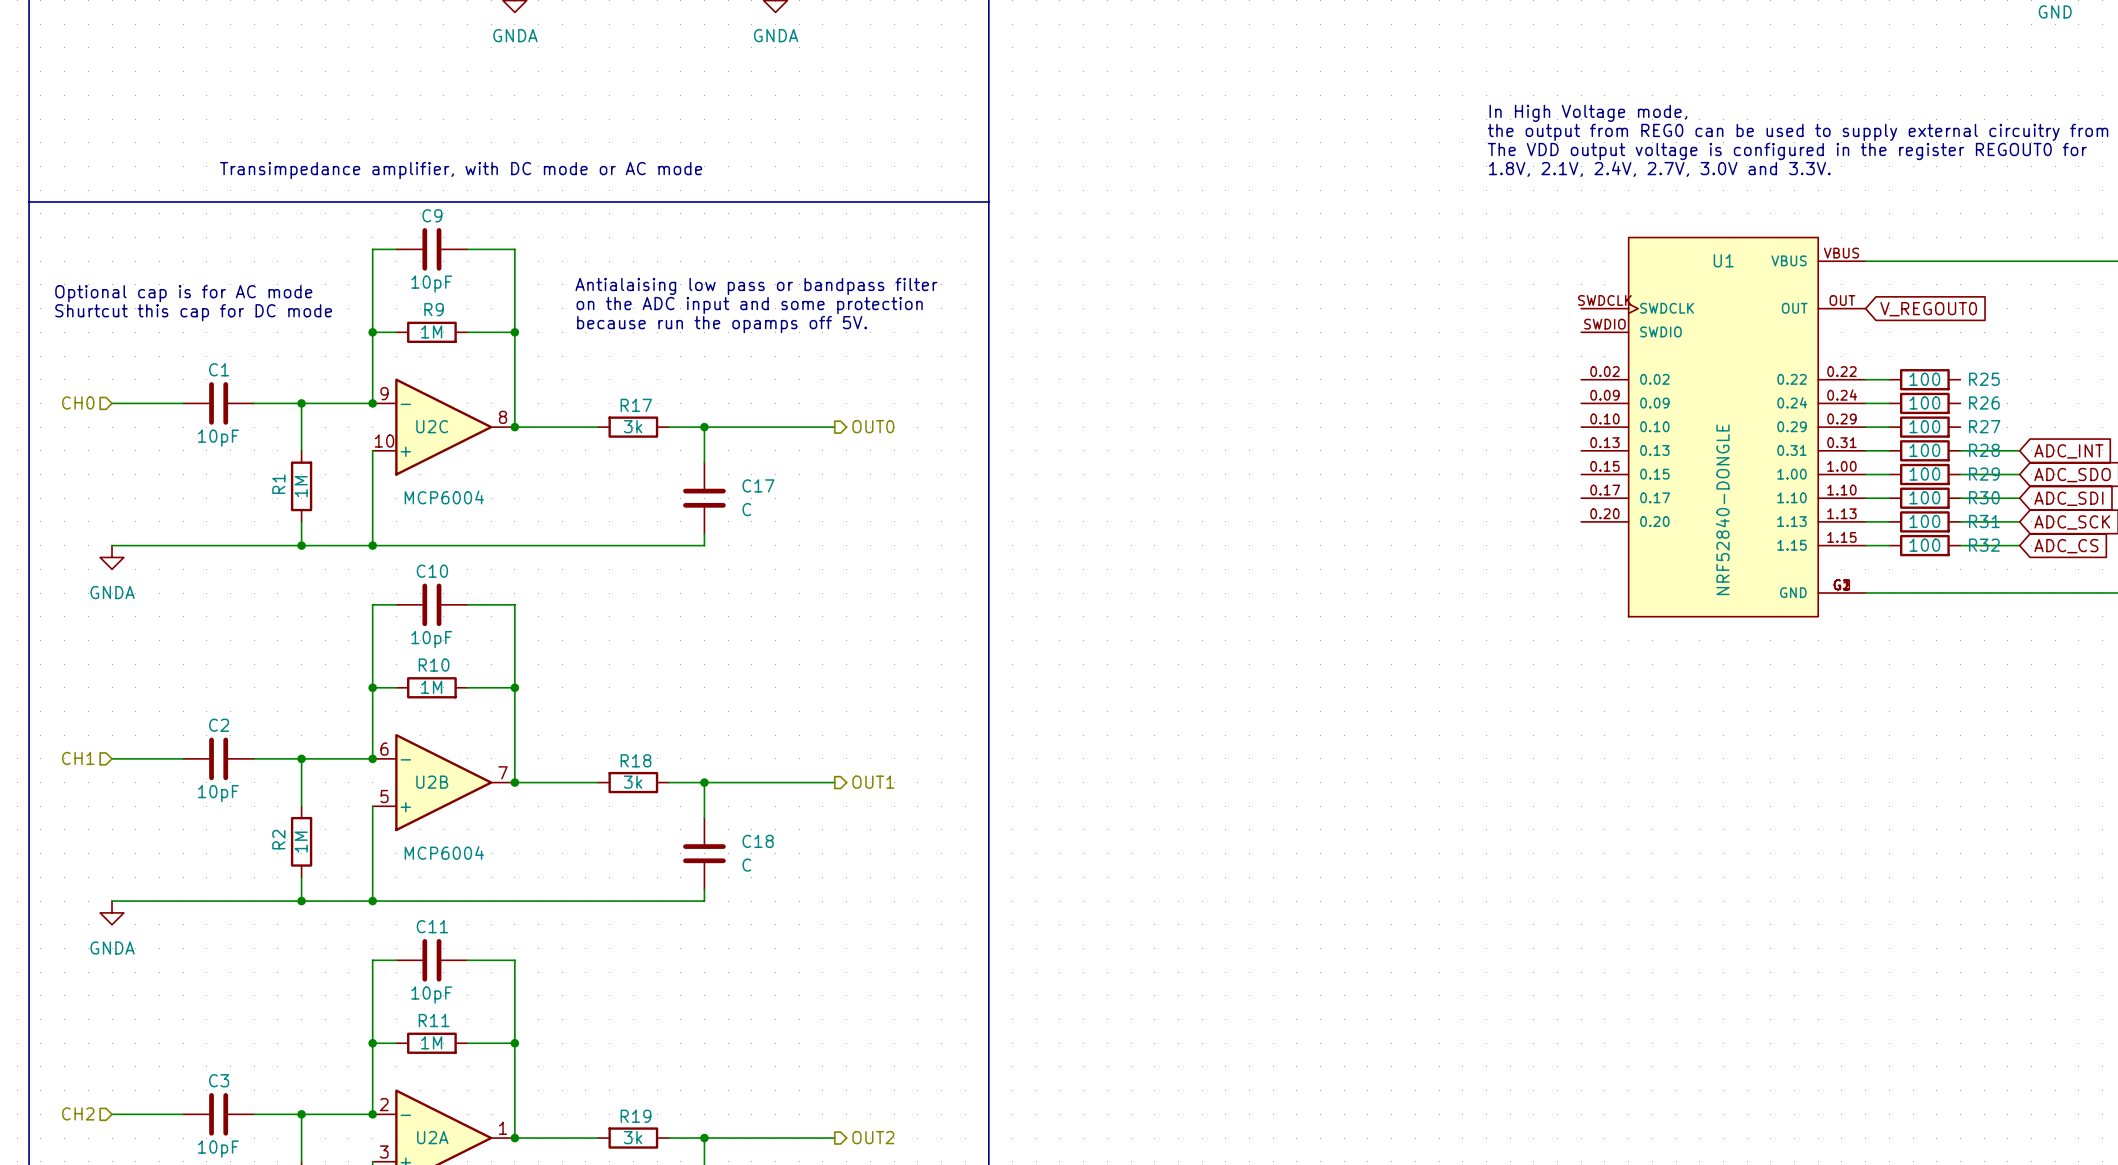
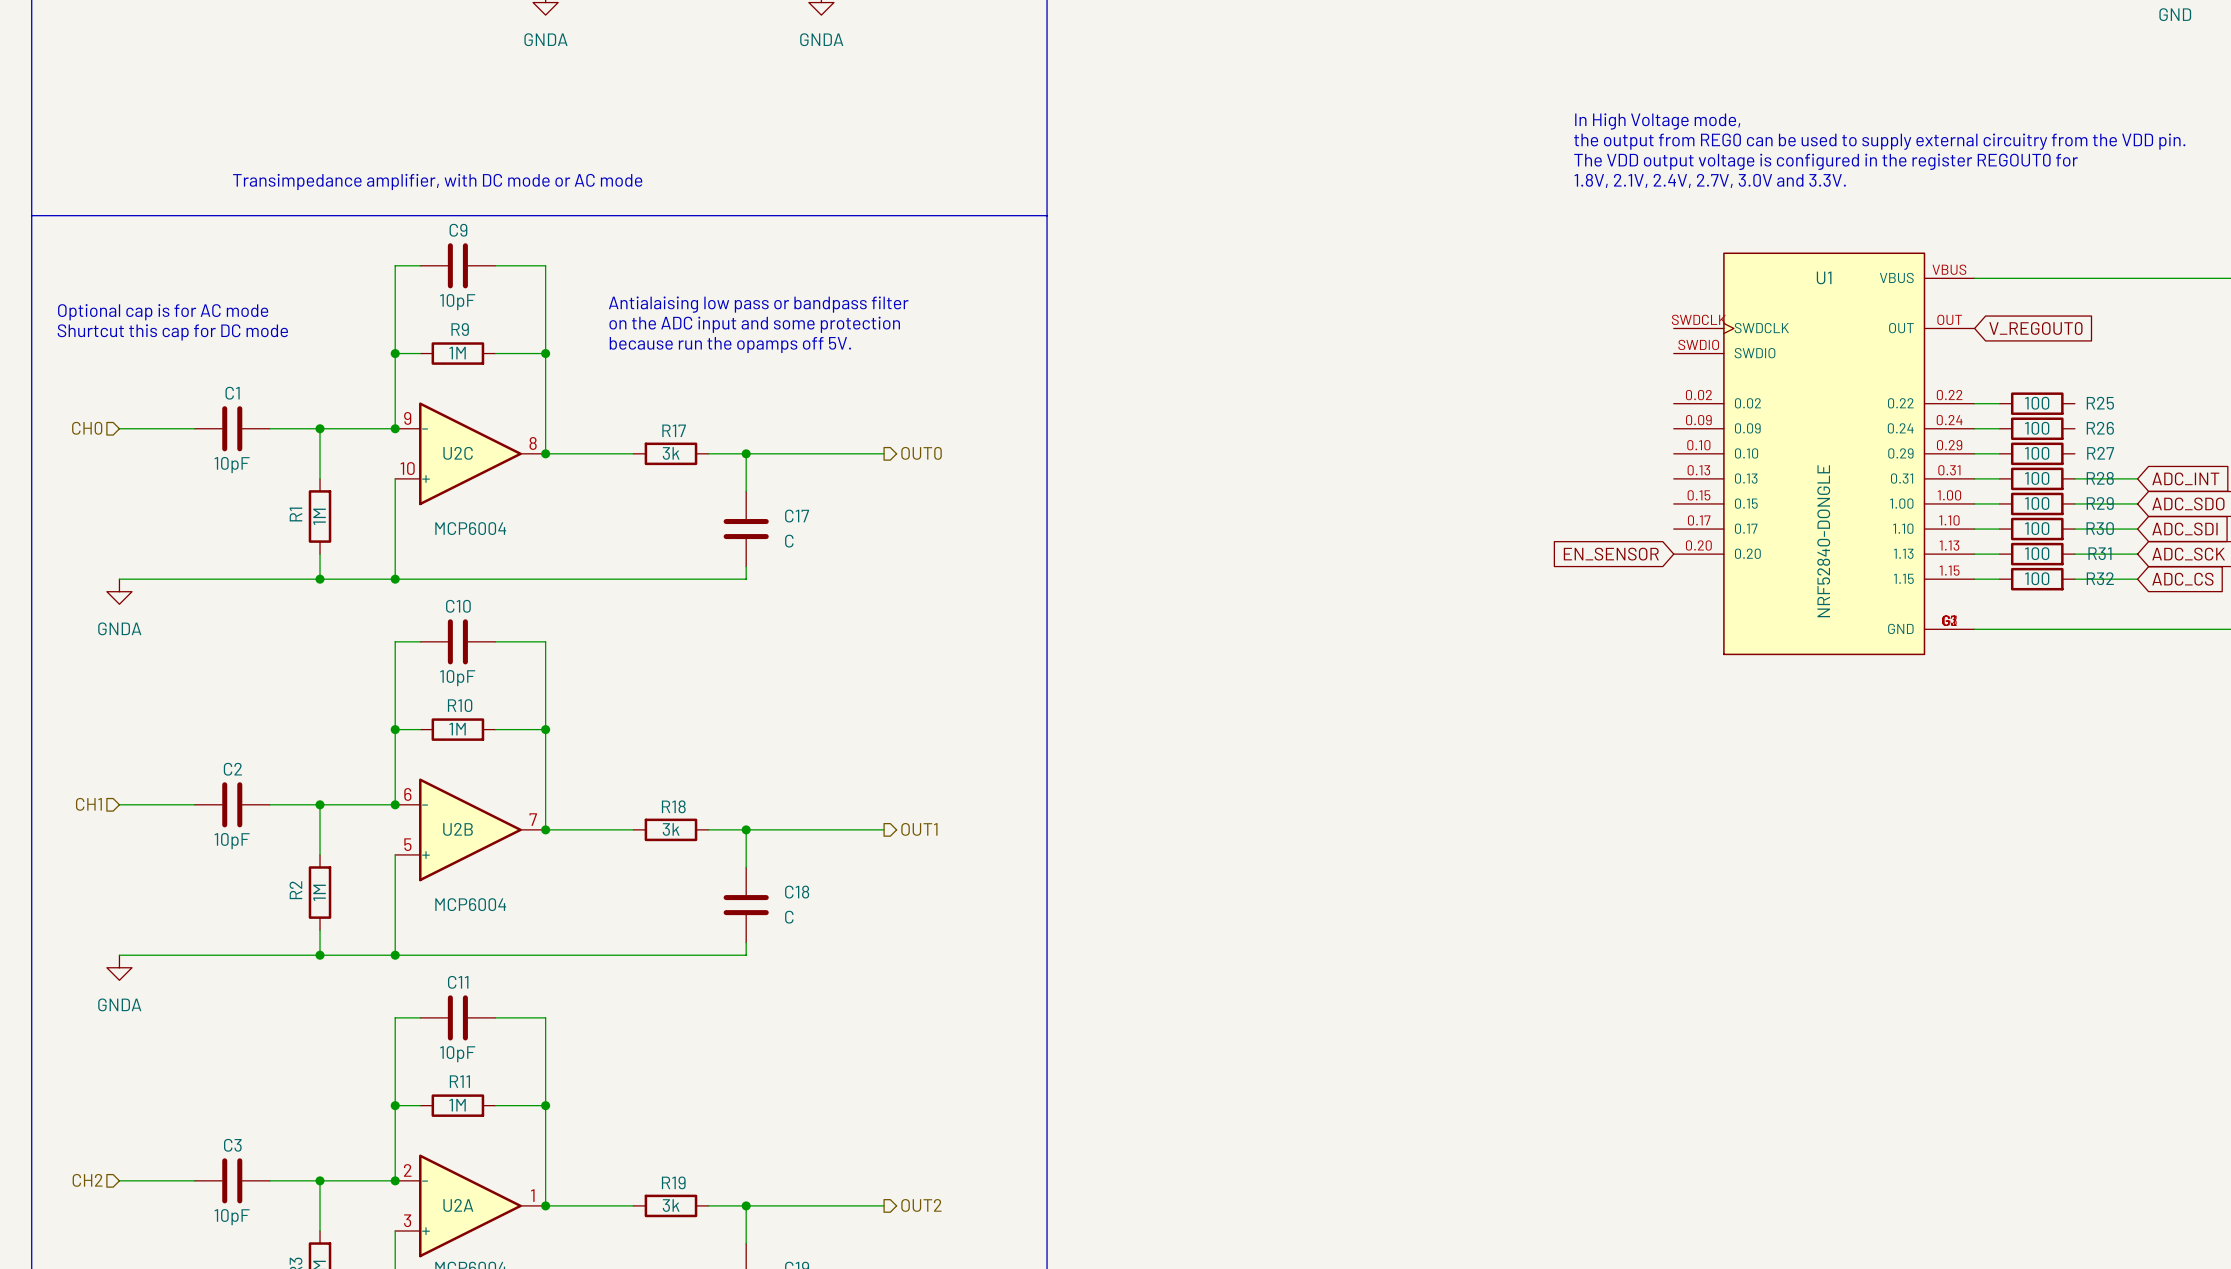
global label: none -> EN_SENSOR (1611, 554)

